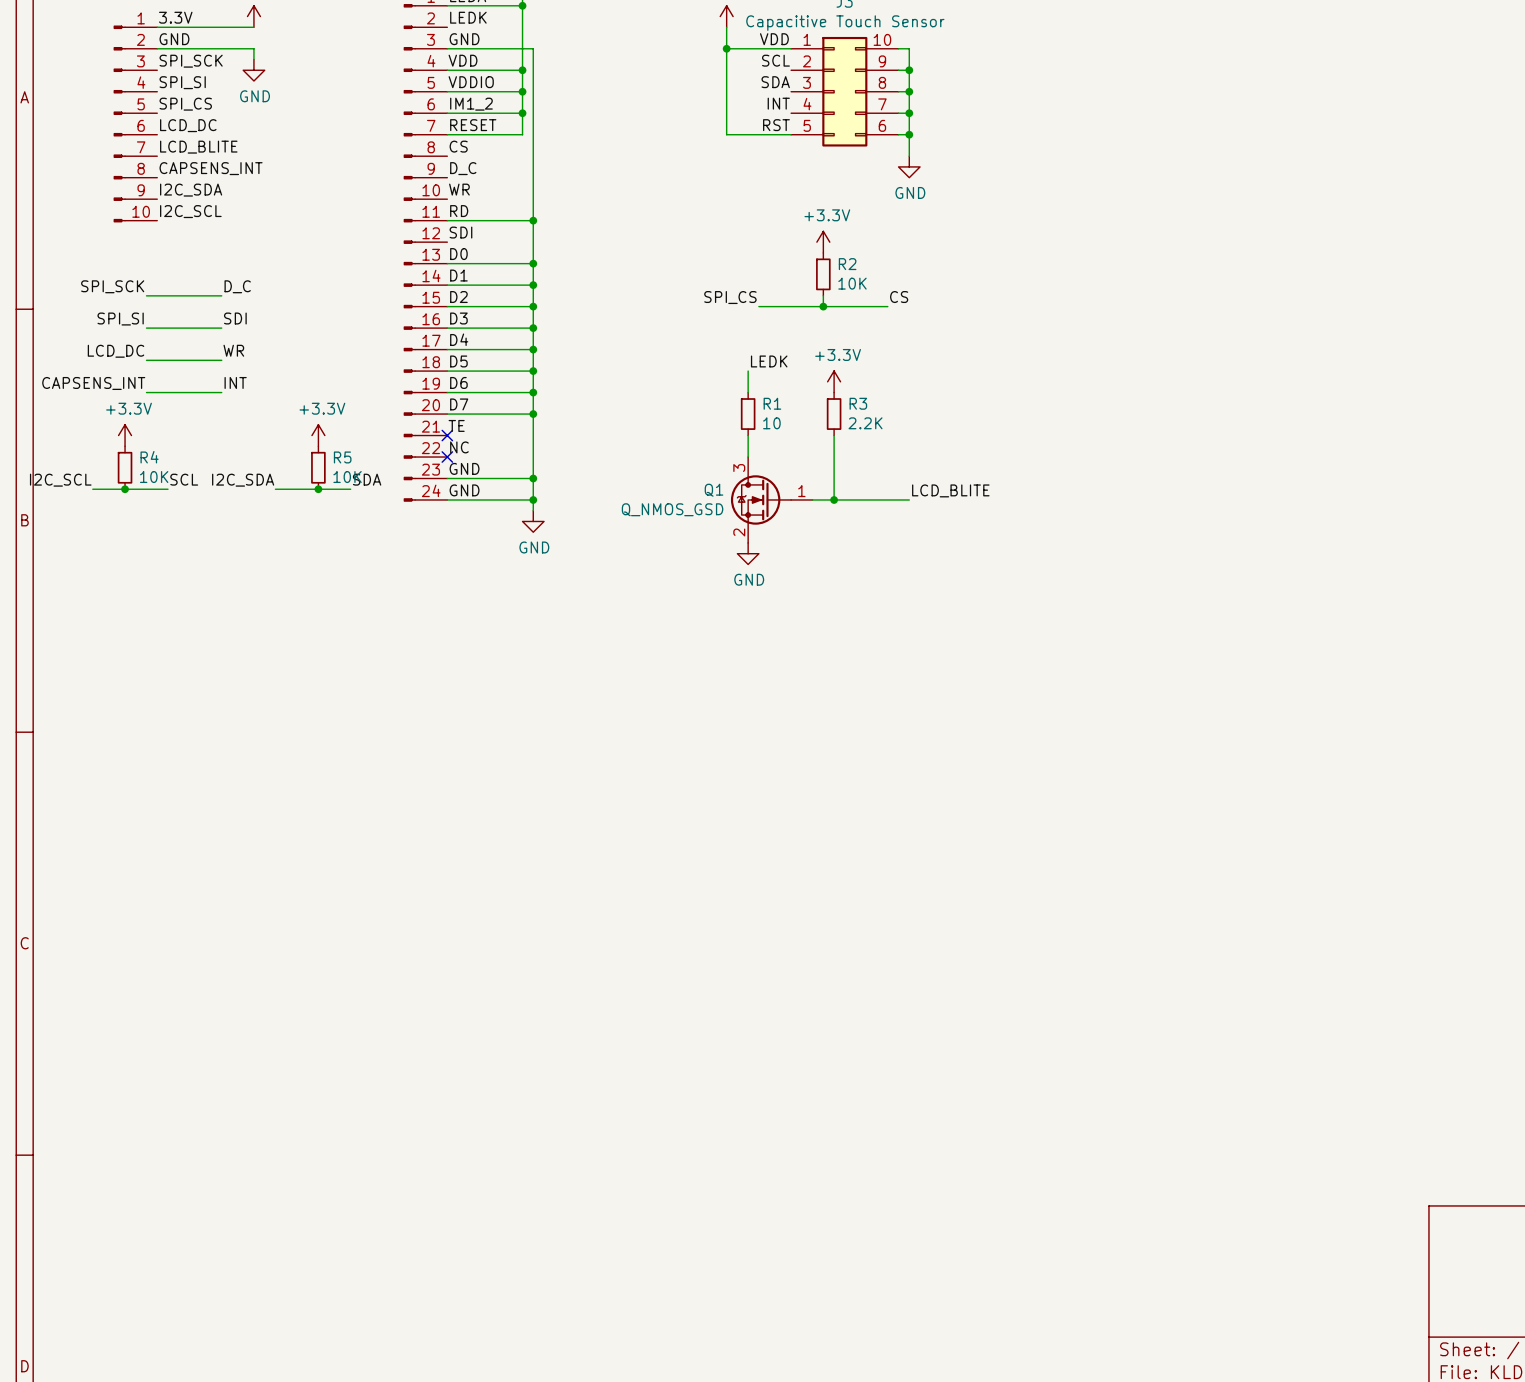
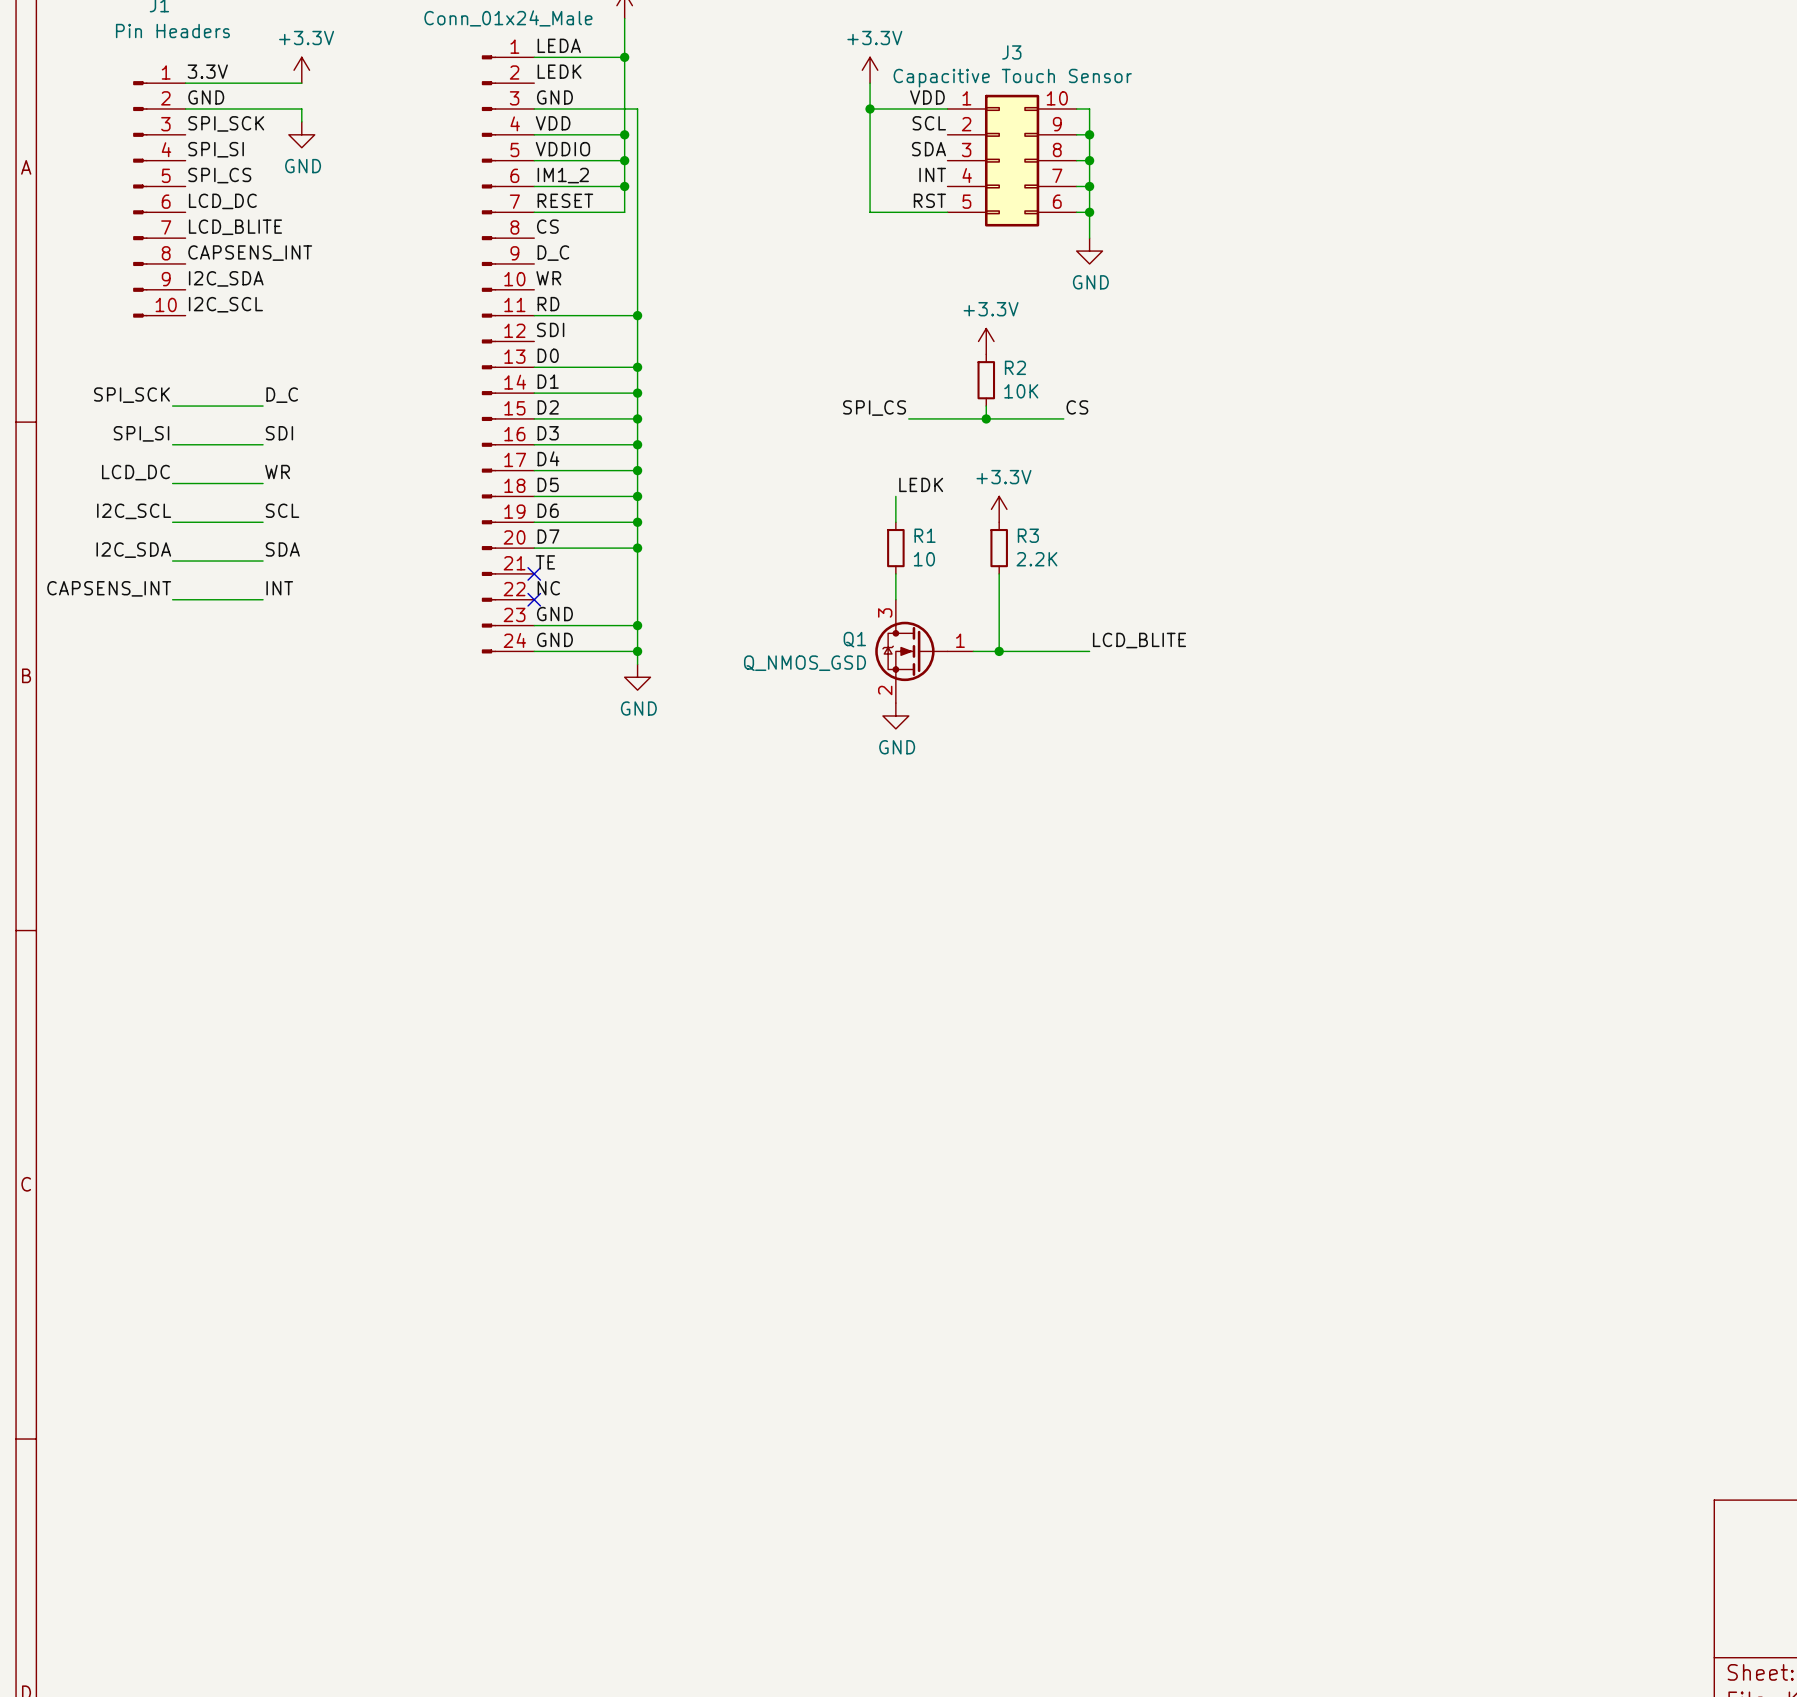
label: INT (235, 382) -> SCL (282, 510)
label: CAPSENS_INT (93, 383) -> I2C_SCL (134, 511)
power symbol: +3.3V (125, 435) -> none
power symbol: +3.3V (318, 435) -> none
label: none -> CAPSENS_INT (109, 588)
label: none -> INT (279, 588)
R4: 10K (125, 467) -> none
R5: 10K (318, 467) -> none
label: SCL (184, 479) -> none
label position: SDA (367, 479) -> SDA (282, 549)
label: I2C_SCL (60, 480) -> none
label position: I2C_SDA (243, 480) -> I2C_SDA (133, 550)
wire: (92, 489) (168, 489) -> (172, 599) (263, 599)
junction: (125, 489) -> none
wire: (275, 489) (350, 489) -> (172, 561) (263, 561)
junction: (318, 489) -> none

